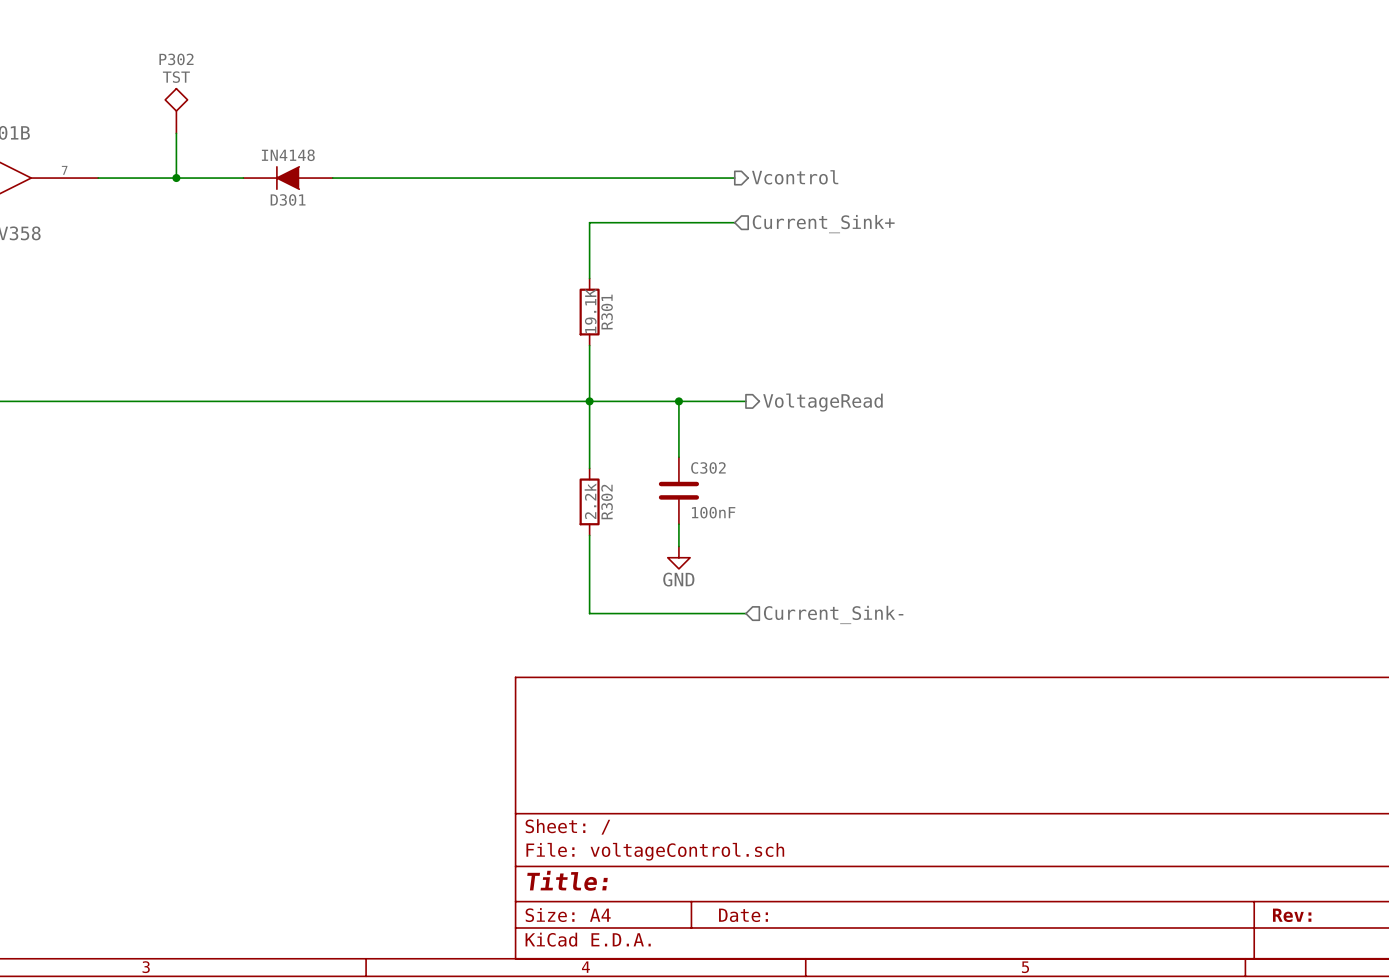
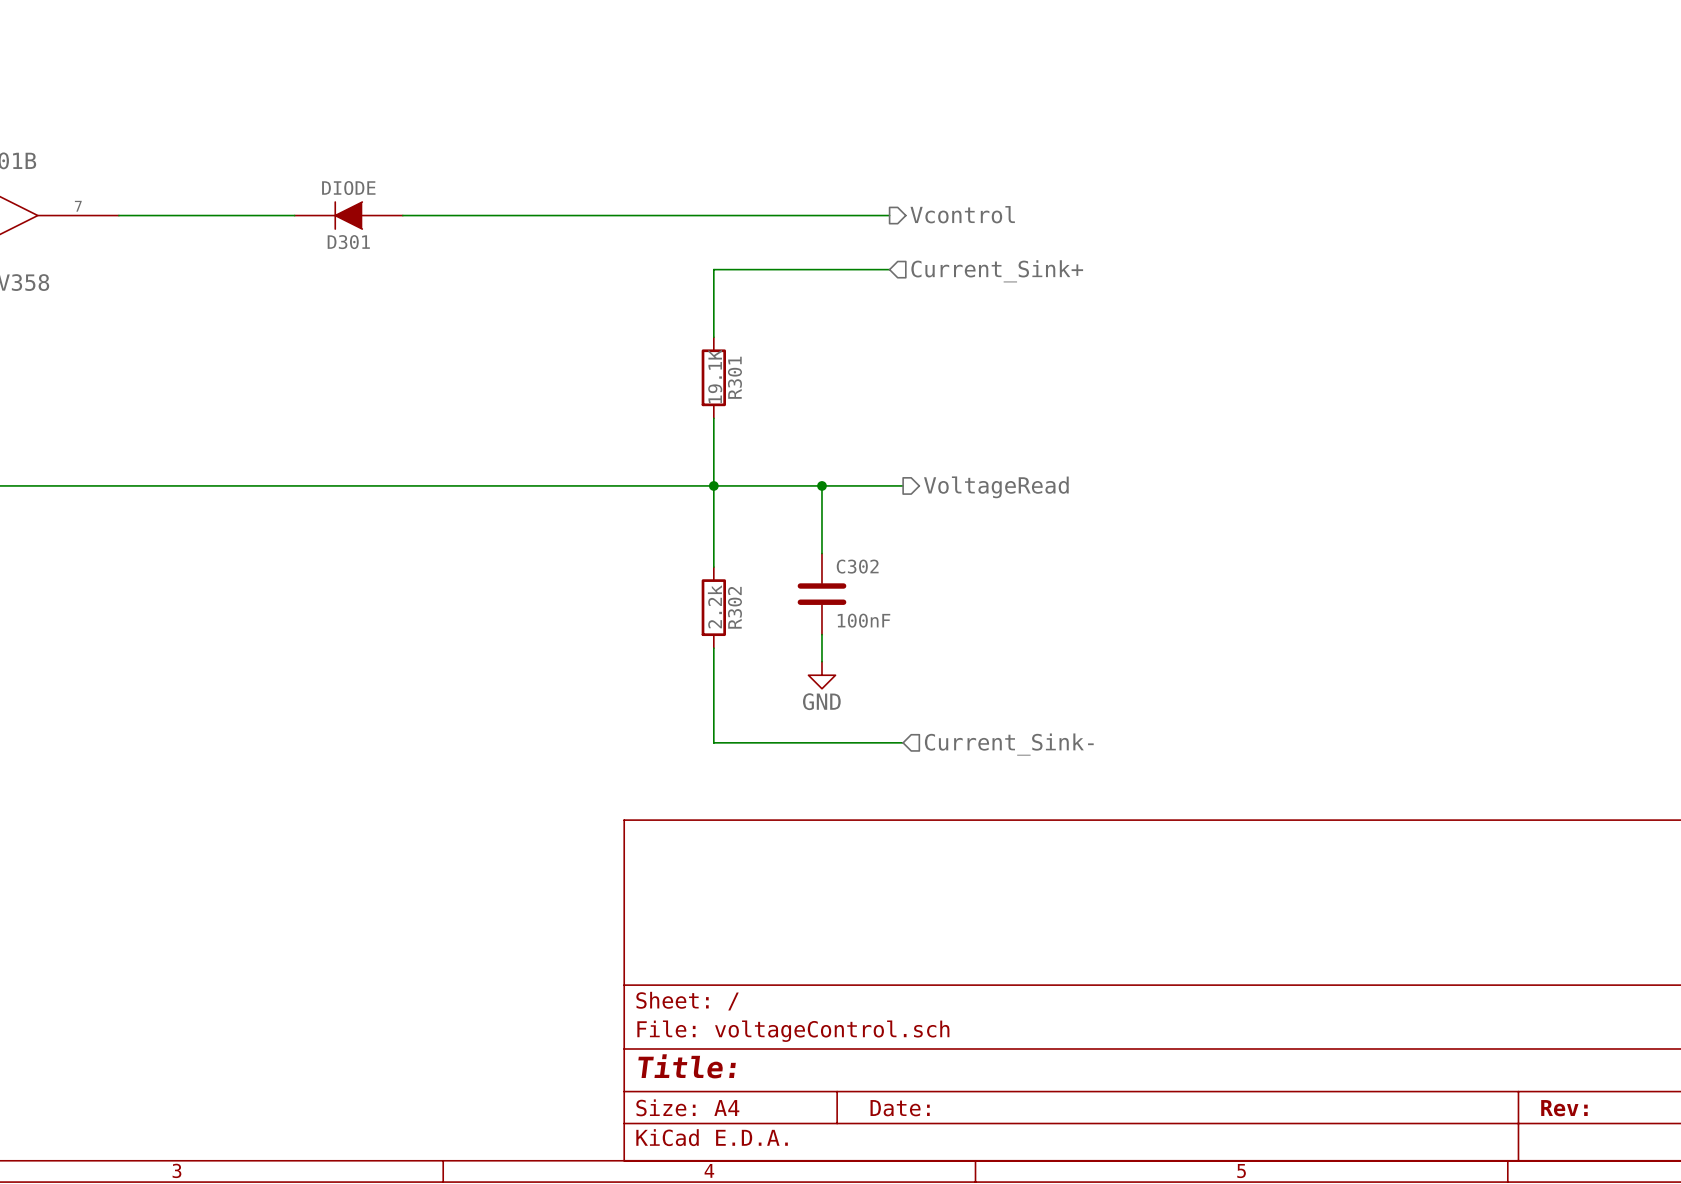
P302: TST (176, 111) -> none
wire: (176, 133) (176, 178) -> none
D301 value: IN4148 (288, 155) -> DIODE (348, 188)
junction: (176, 178) -> none

